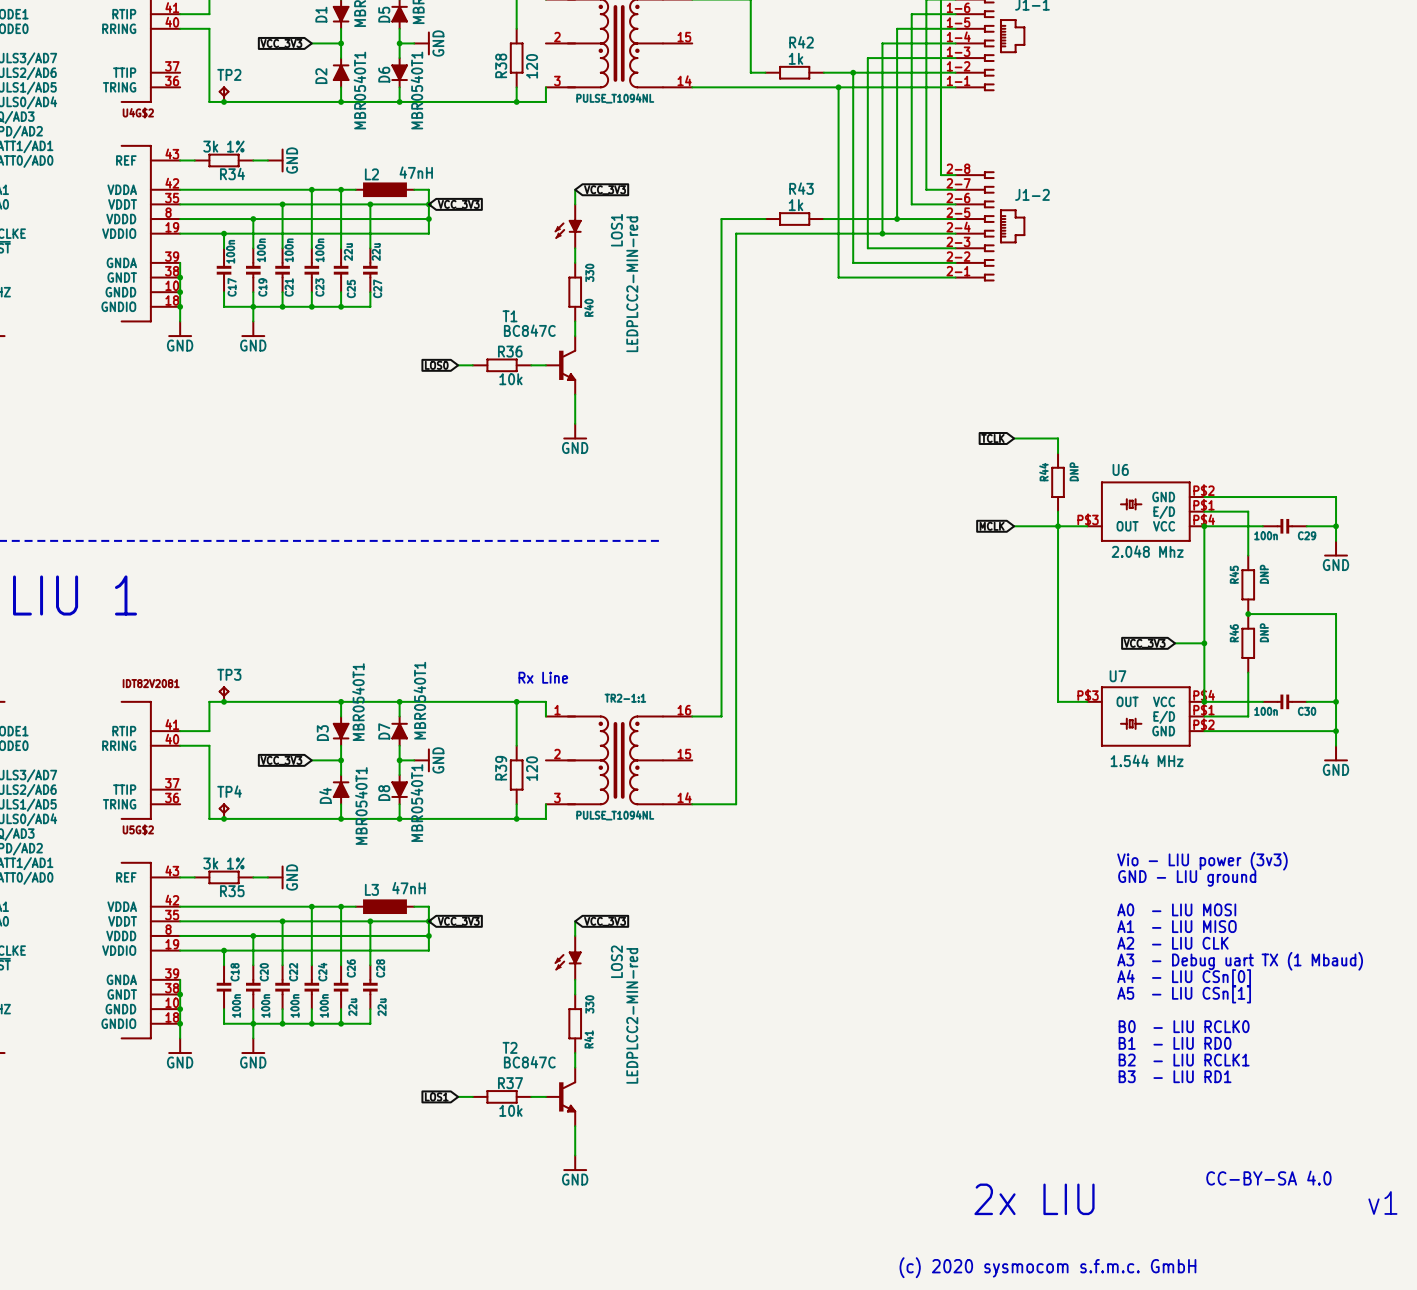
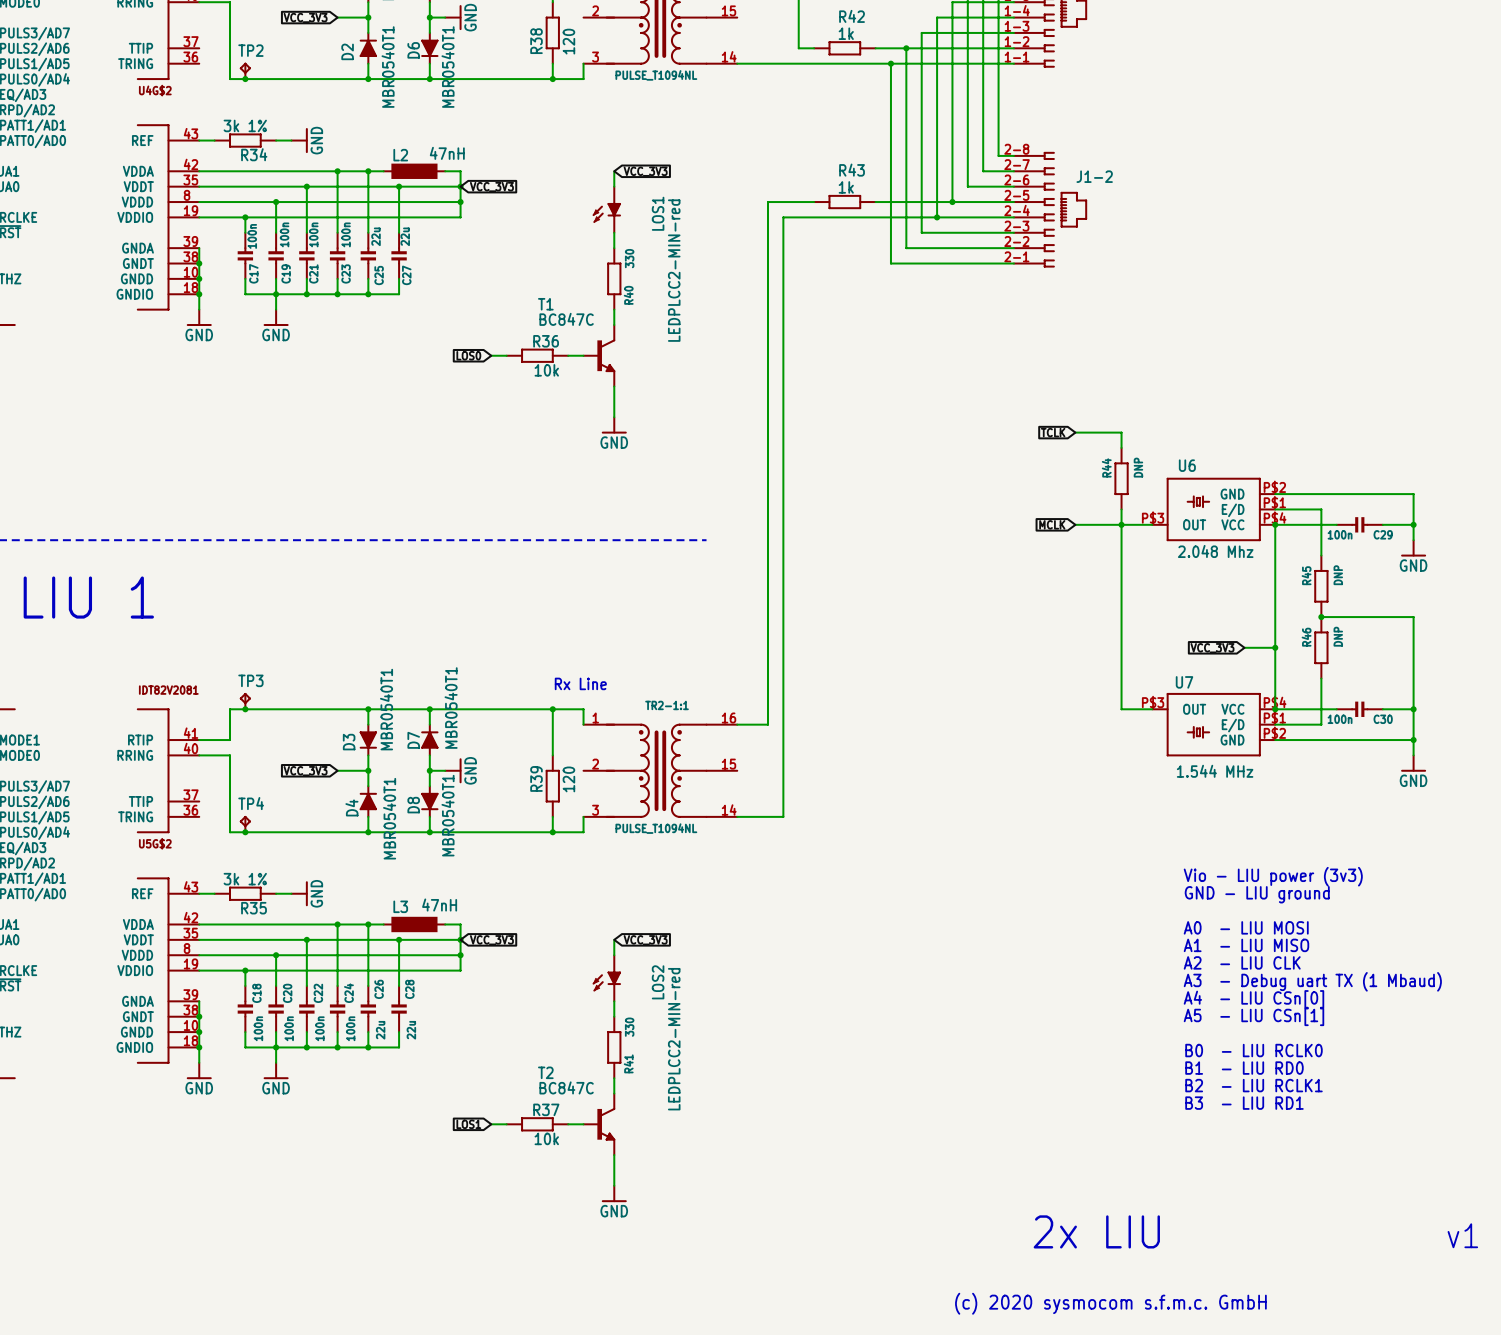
text: CC-BY-SA 4.0 (1268, 1178) -> none

